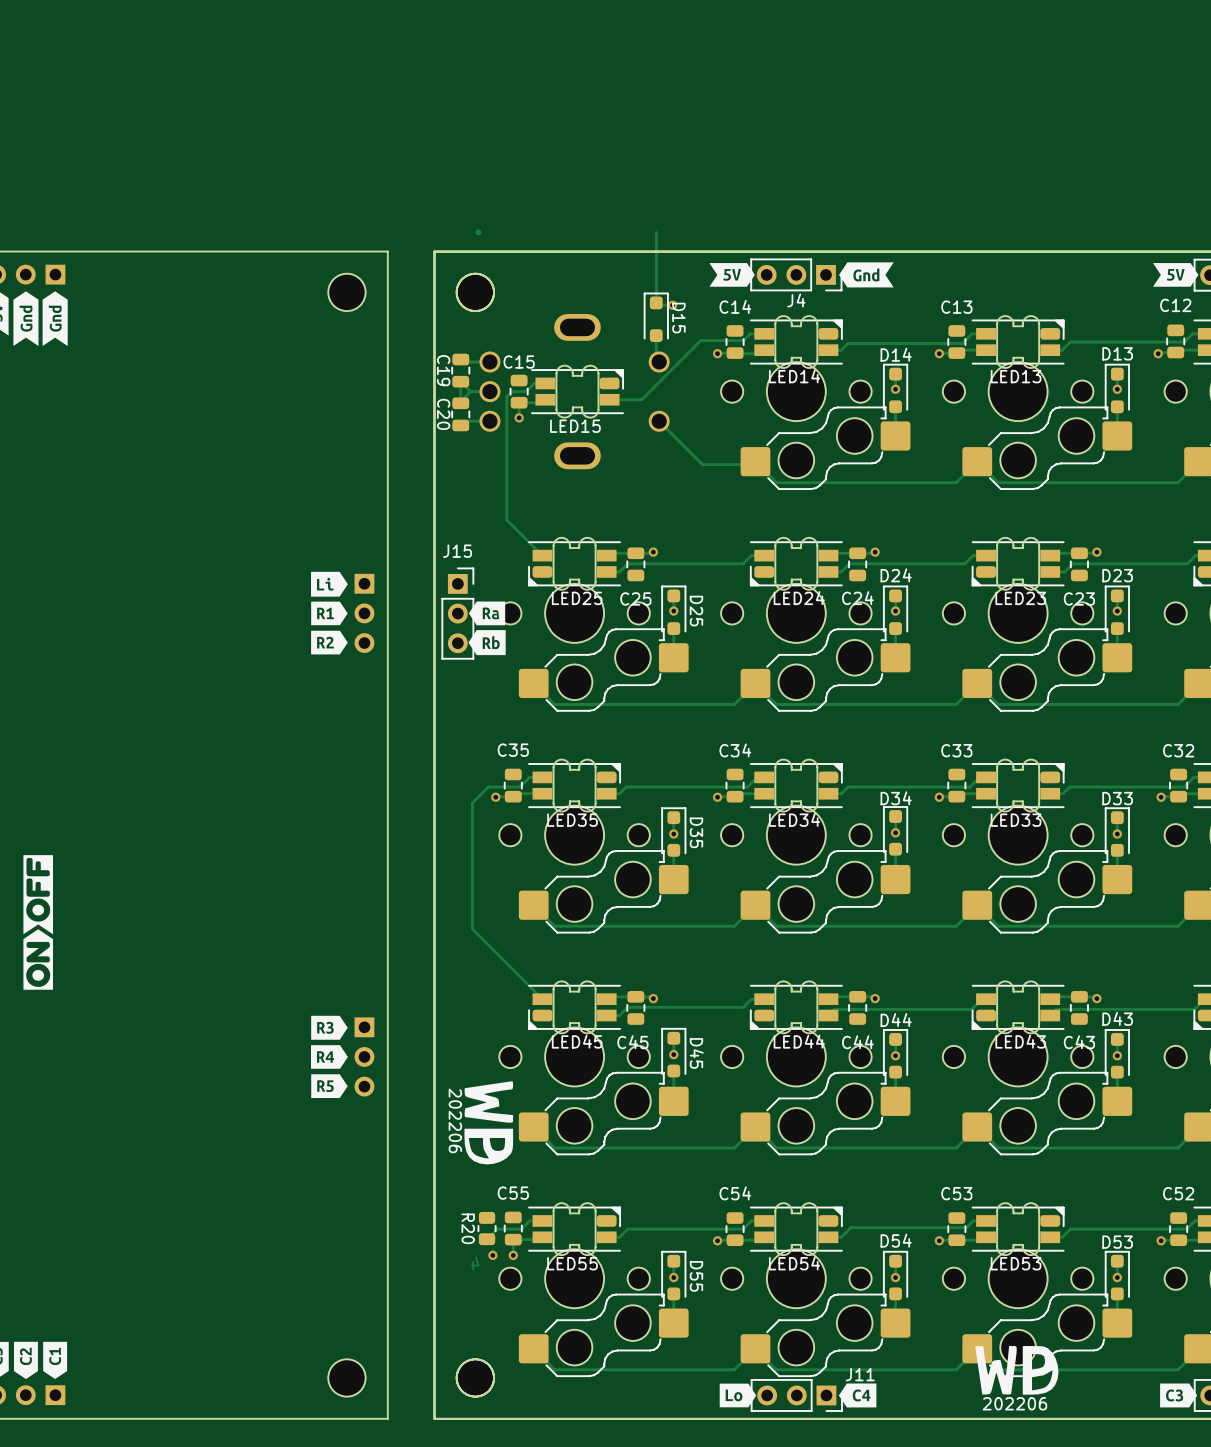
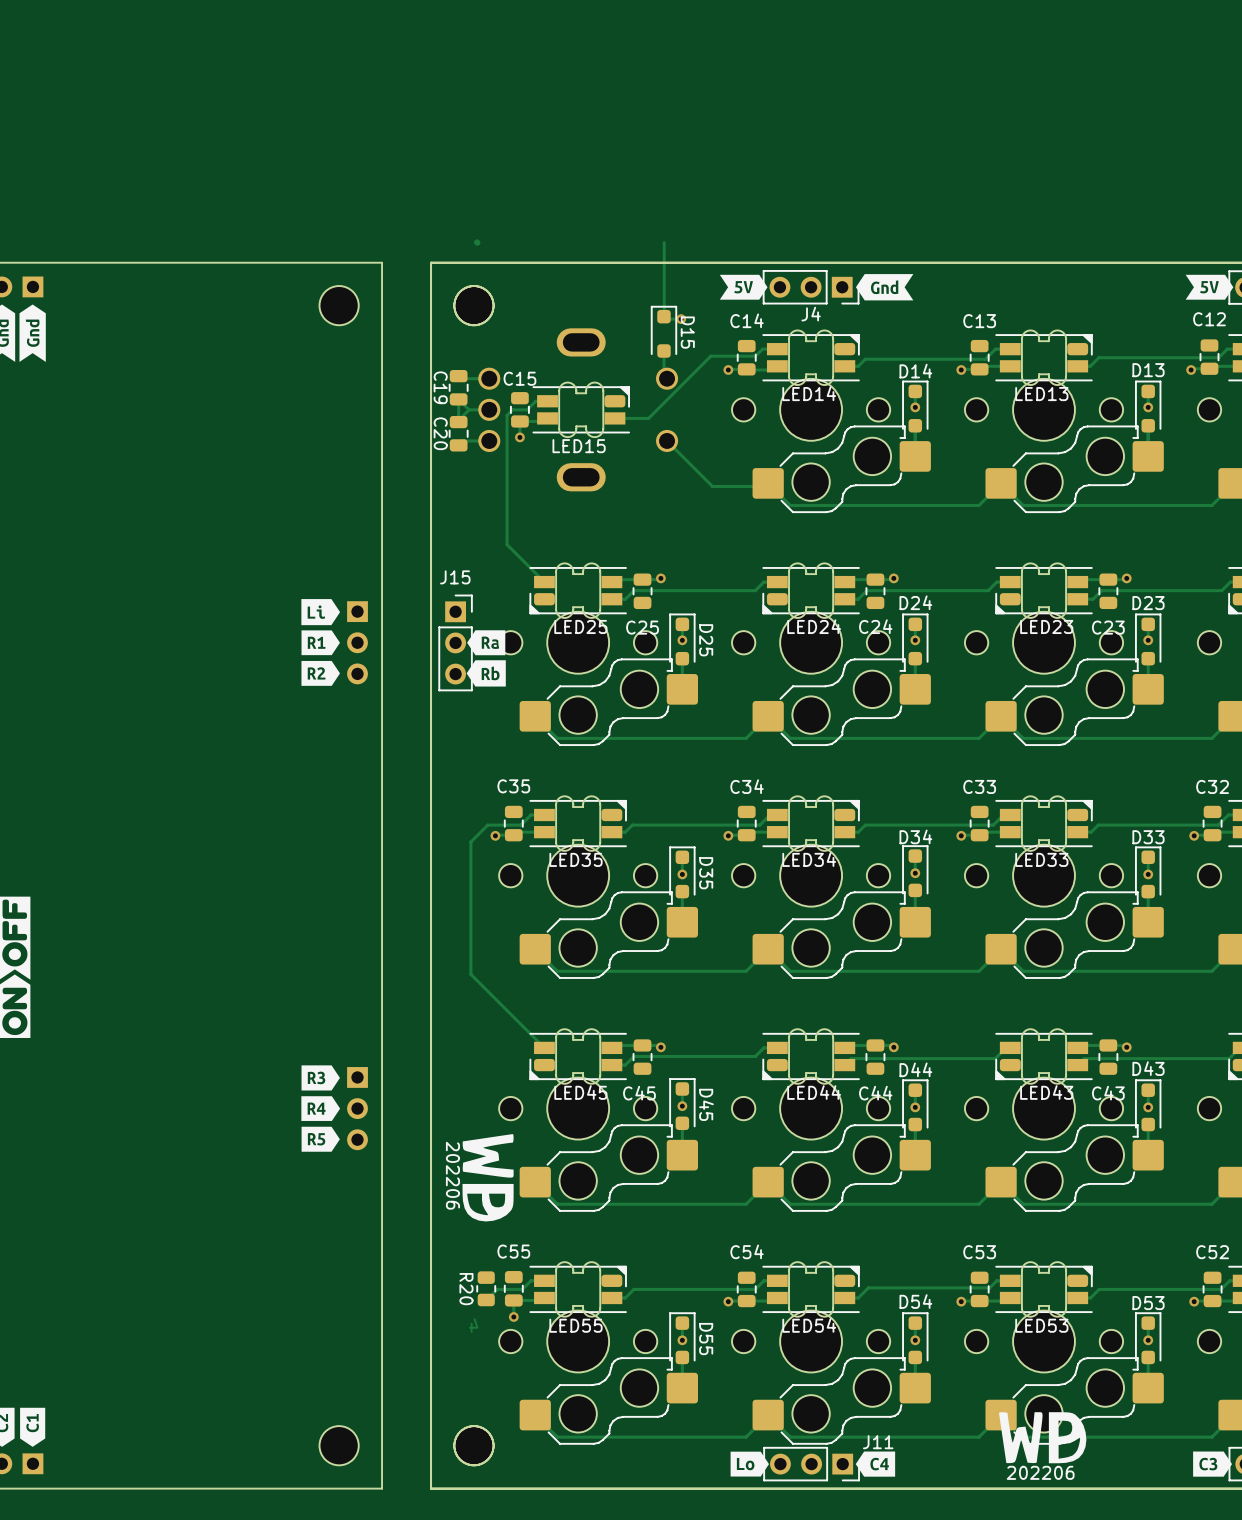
via: (492, 1255) -> none

